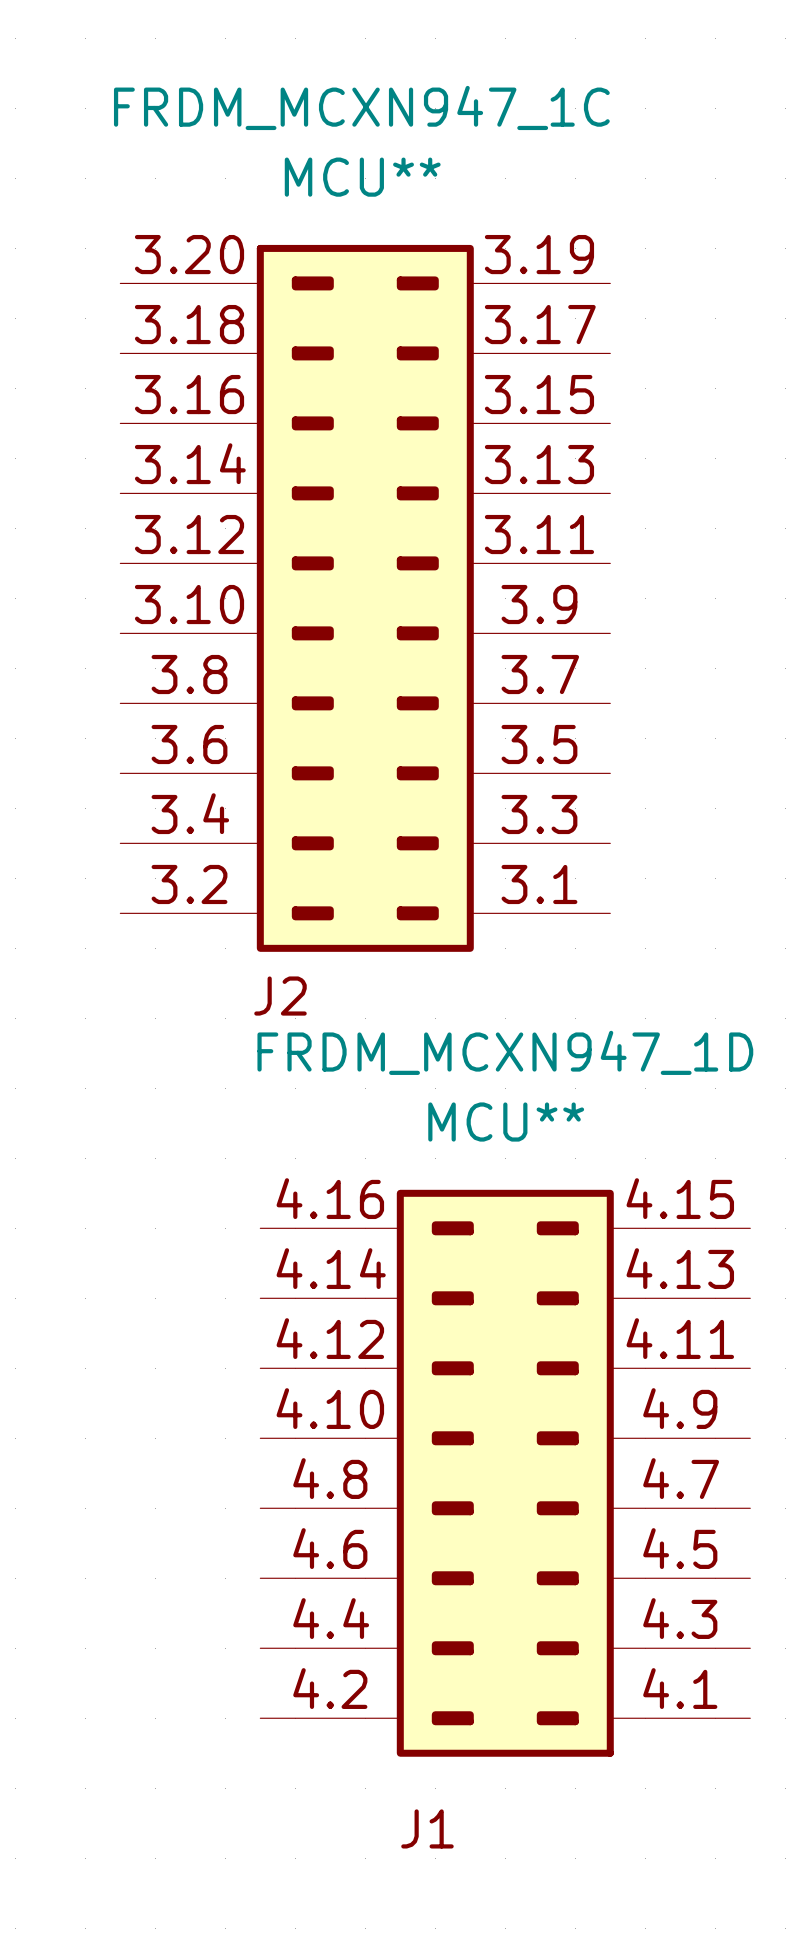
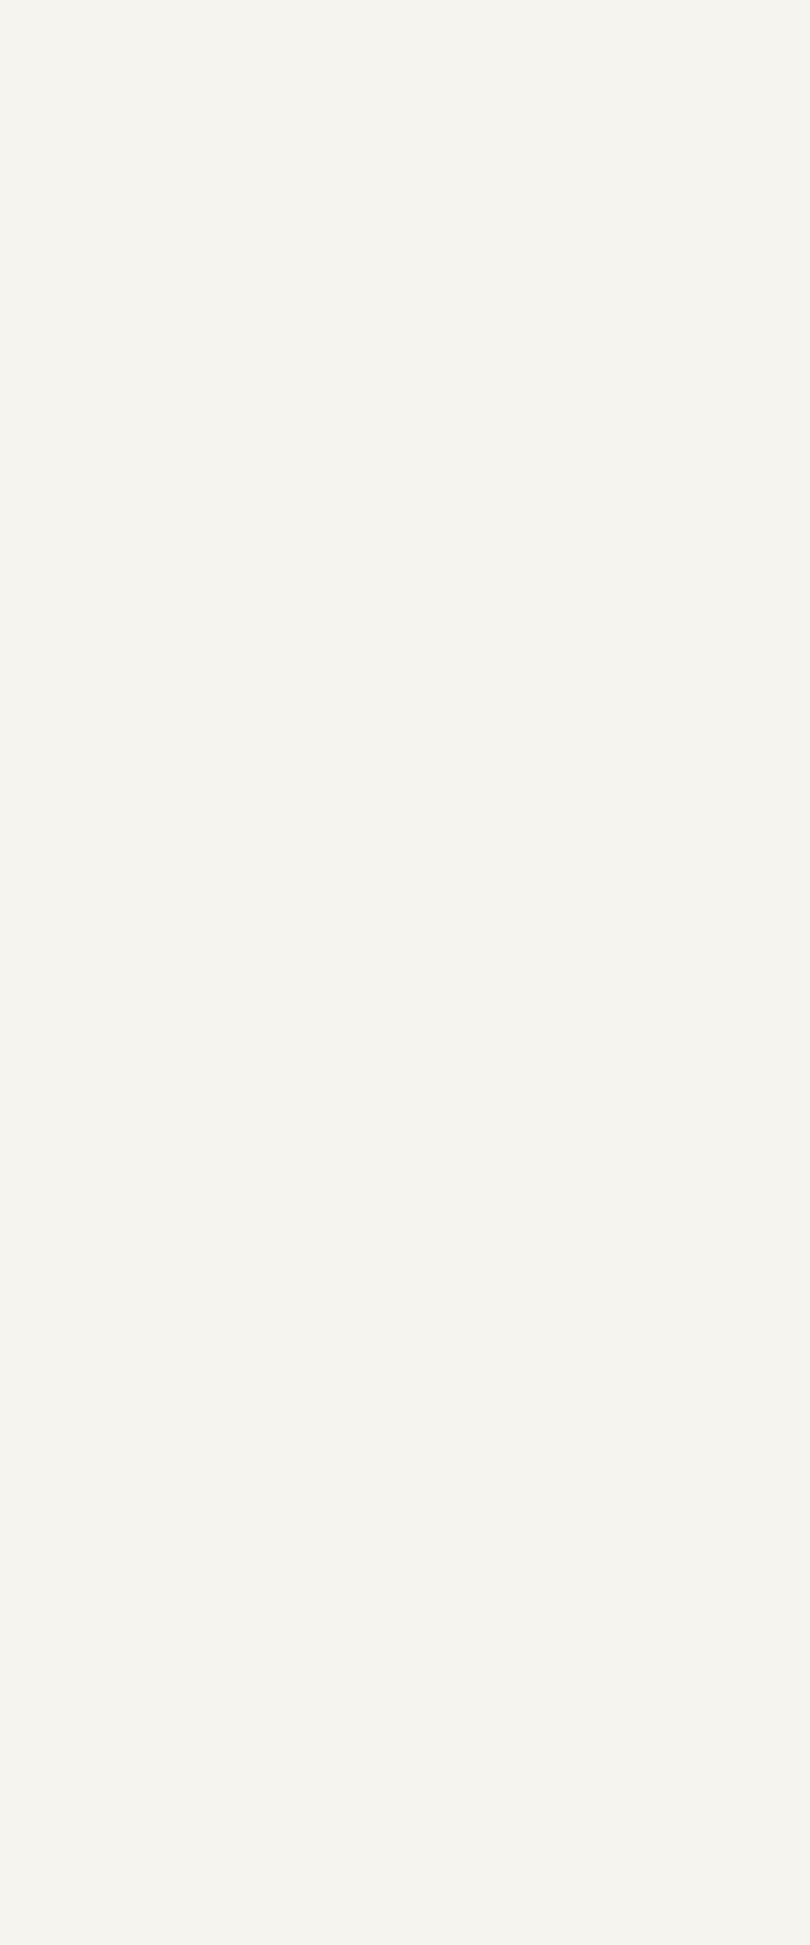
FRDM_MCXN947_1C: MCU** (365, 598) -> none
FRDM_MCXN947_1D: MCU** (505, 1473) -> none

